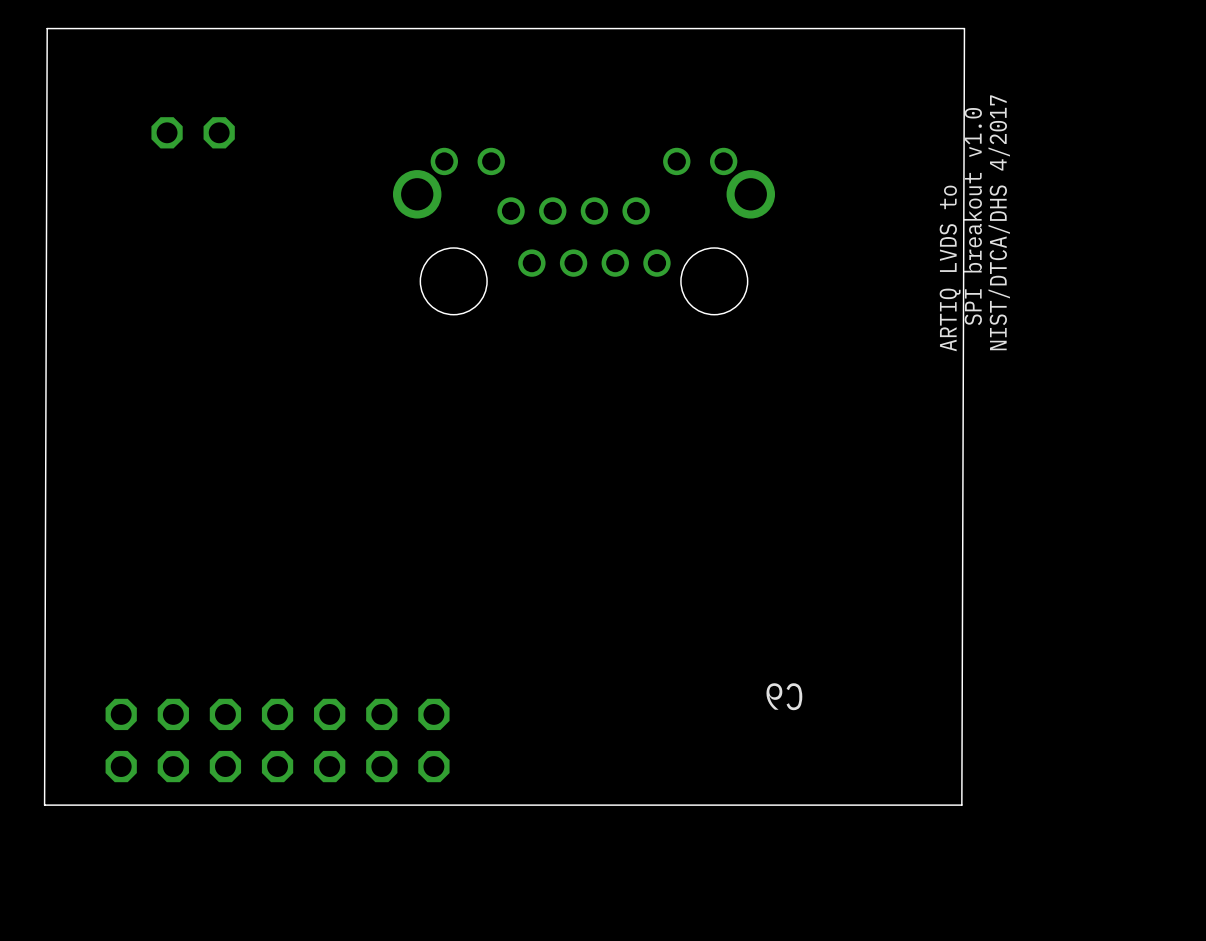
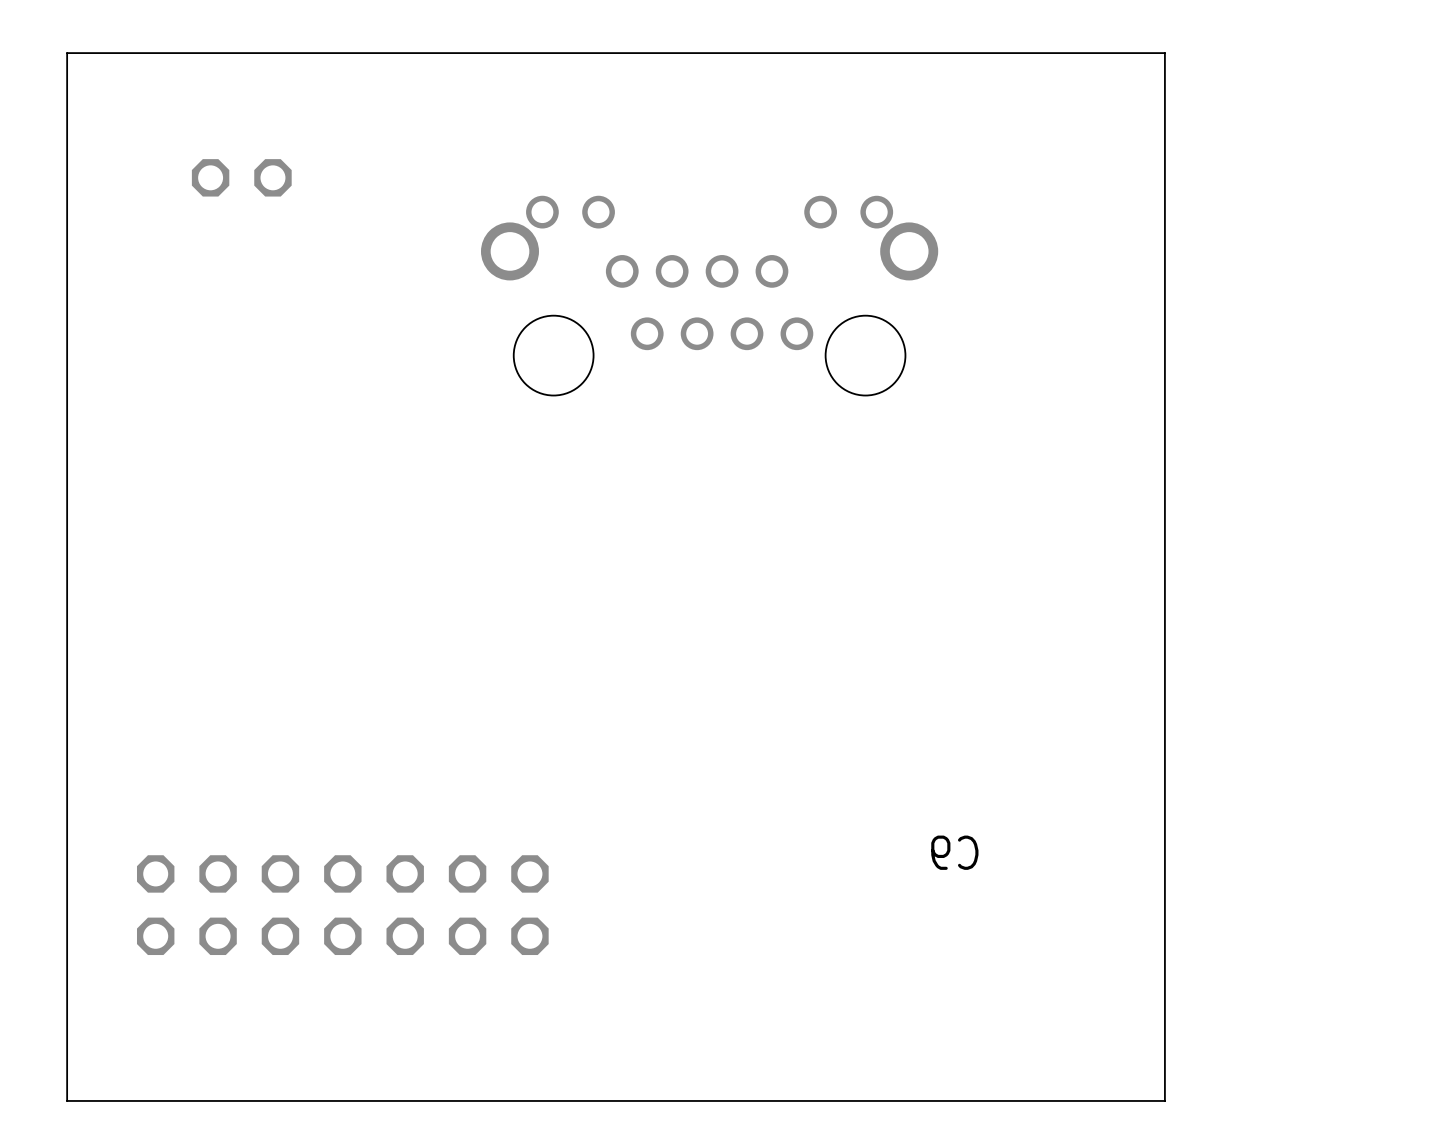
board edge: (964, 28) (961, 805) (44, 805) (47, 28) -> (1164, 53) (1164, 1100) (67, 1100) (67, 53)
text: SPI breakout v1.0 (972, 216) -> none
text: NIST/DTCA/DHS 4/2017 (999, 222) -> none
text: ARTIQ LVDS to (950, 268) -> none

